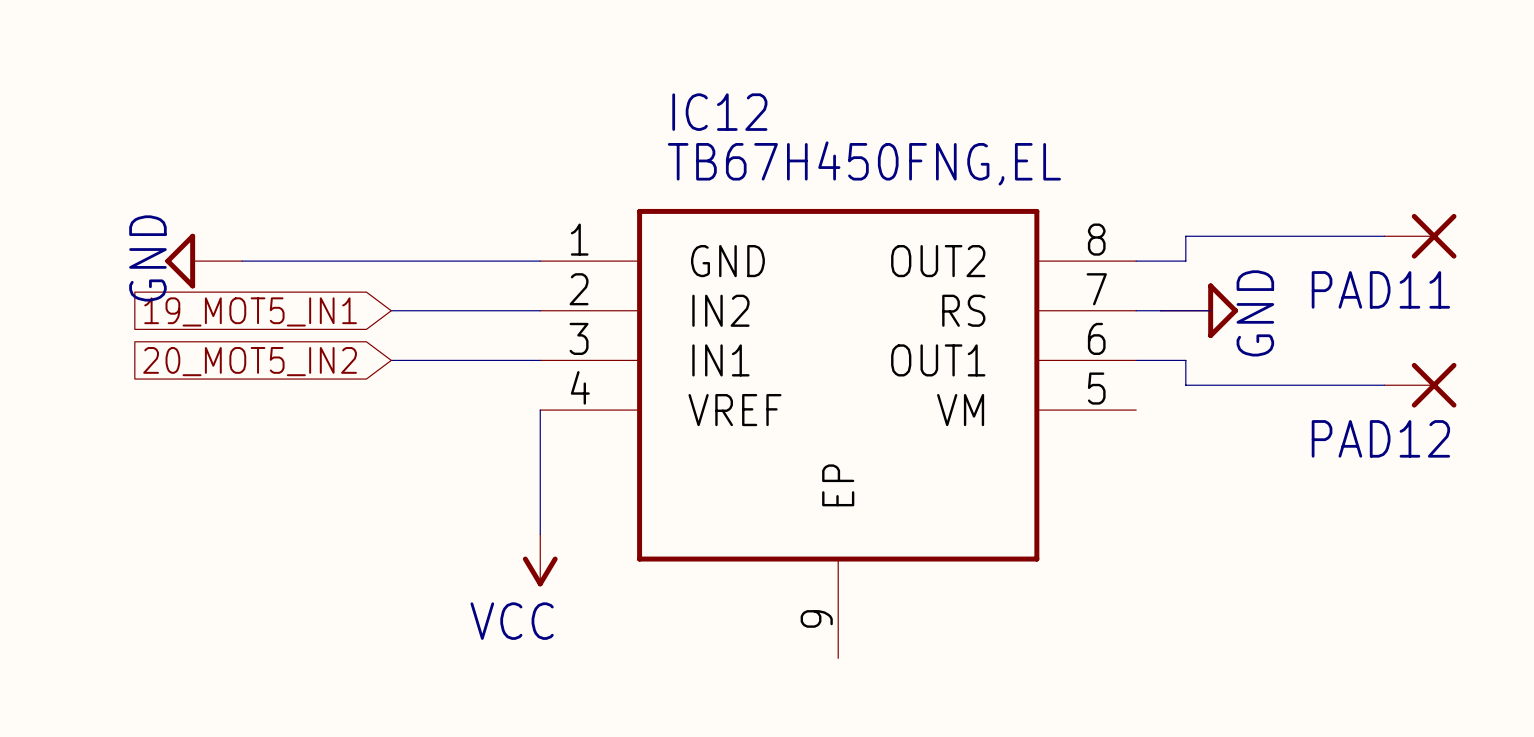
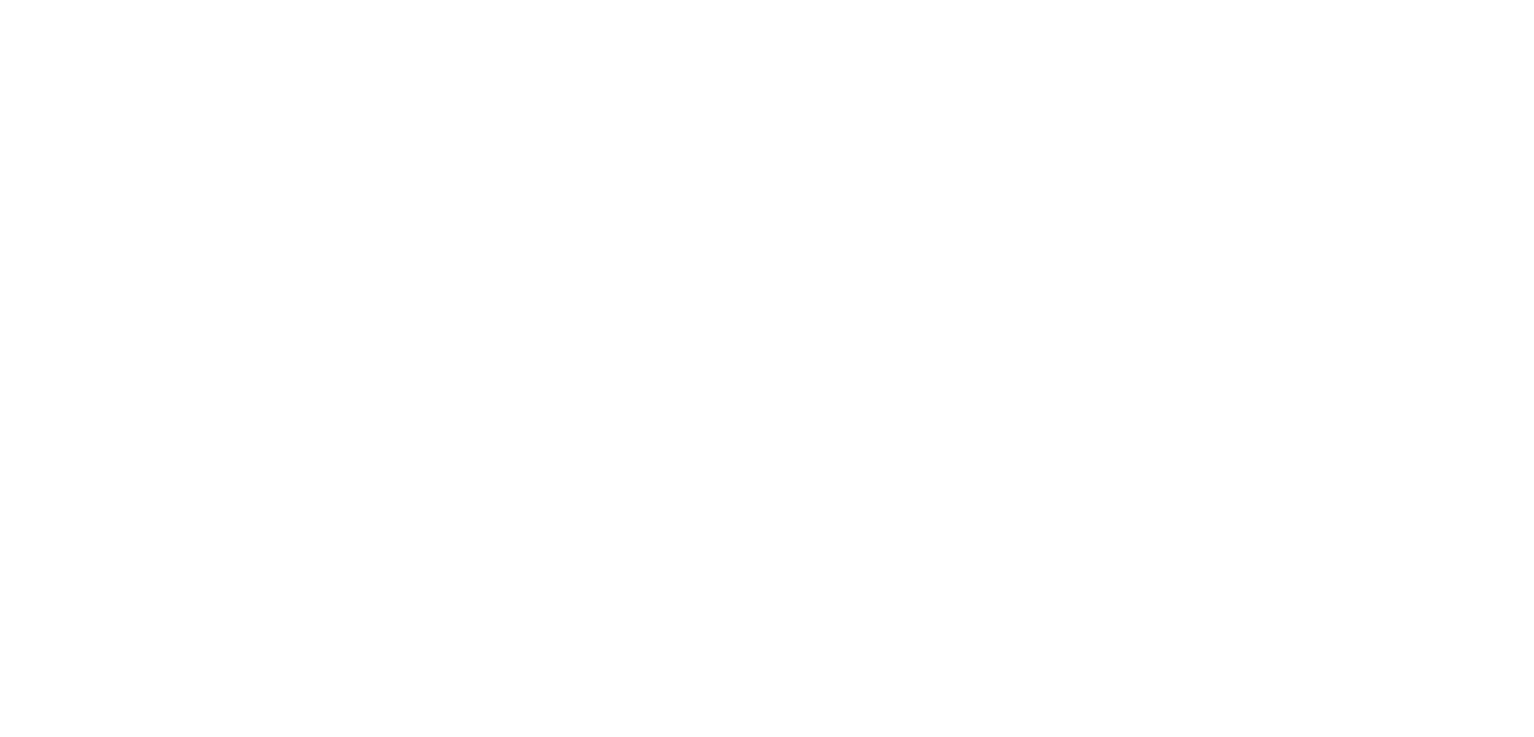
wire: (1384, 236) (1185, 236) (1185, 261) (1136, 261) -> none
PAD11: (1420, 236) -> none
power symbol: GND (203, 261) -> none
wire: (242, 261) (540, 261) -> none
wire: (391, 310) (540, 310) -> none
wire: (1136, 310) (1210, 310) -> none
power symbol: GND (1199, 310) -> none
global label: 19_MOT5_IN1 (250, 311) -> none
wire: (391, 360) (540, 360) -> none
wire: (1136, 360) (1185, 360) (1185, 385) (1384, 385) -> none
global label: 20_MOT5_IN2 (250, 361) -> none
PAD12: (1420, 385) -> none
wire: (540, 410) (540, 534) -> none
IC12: TB67H450FNG,EL (838, 433) -> none
power symbol: VCC (540, 560) -> none

